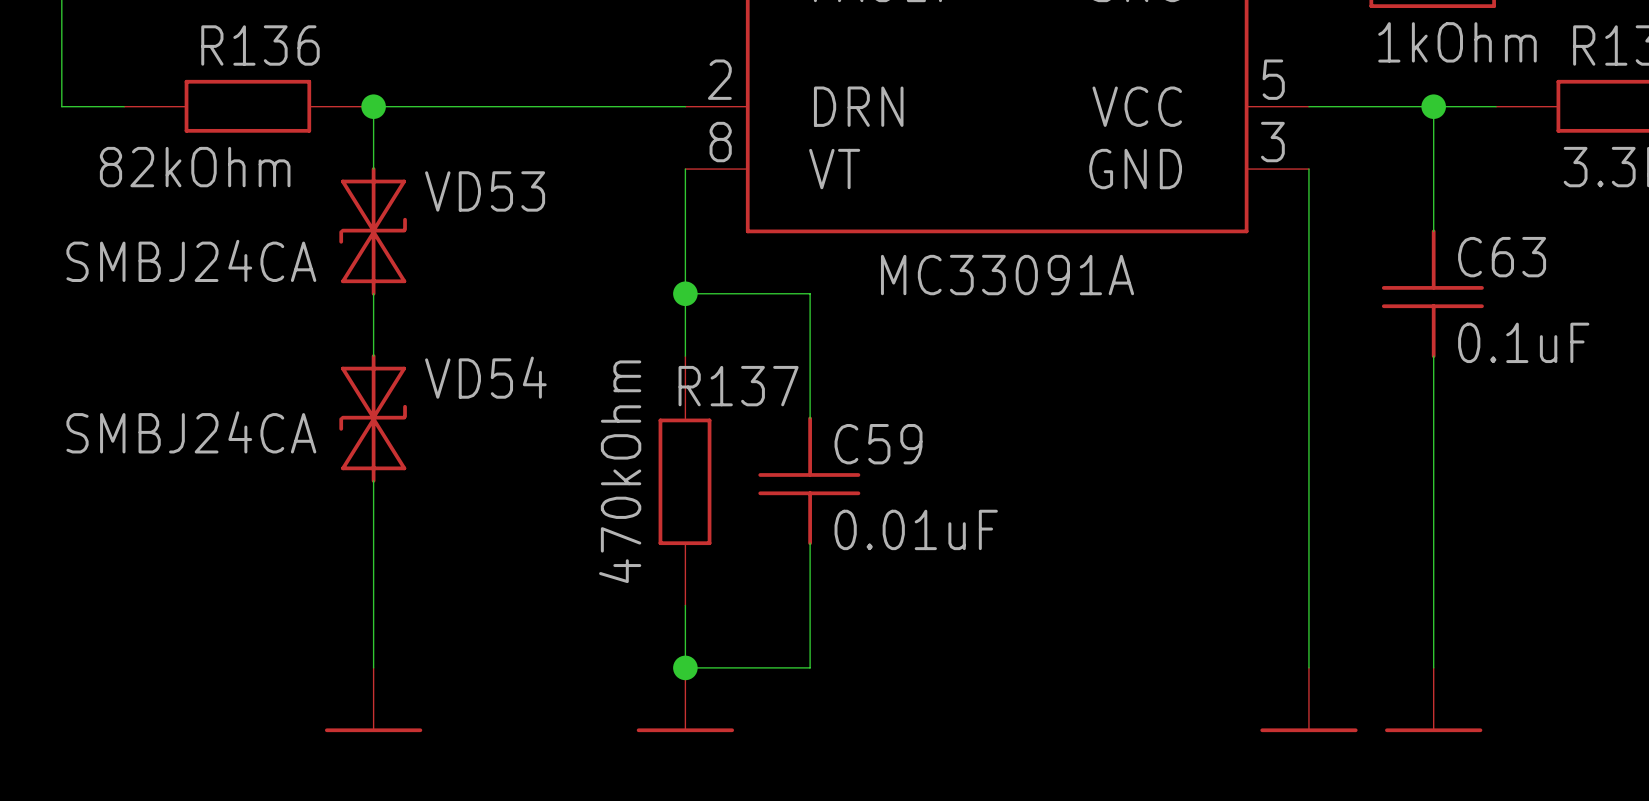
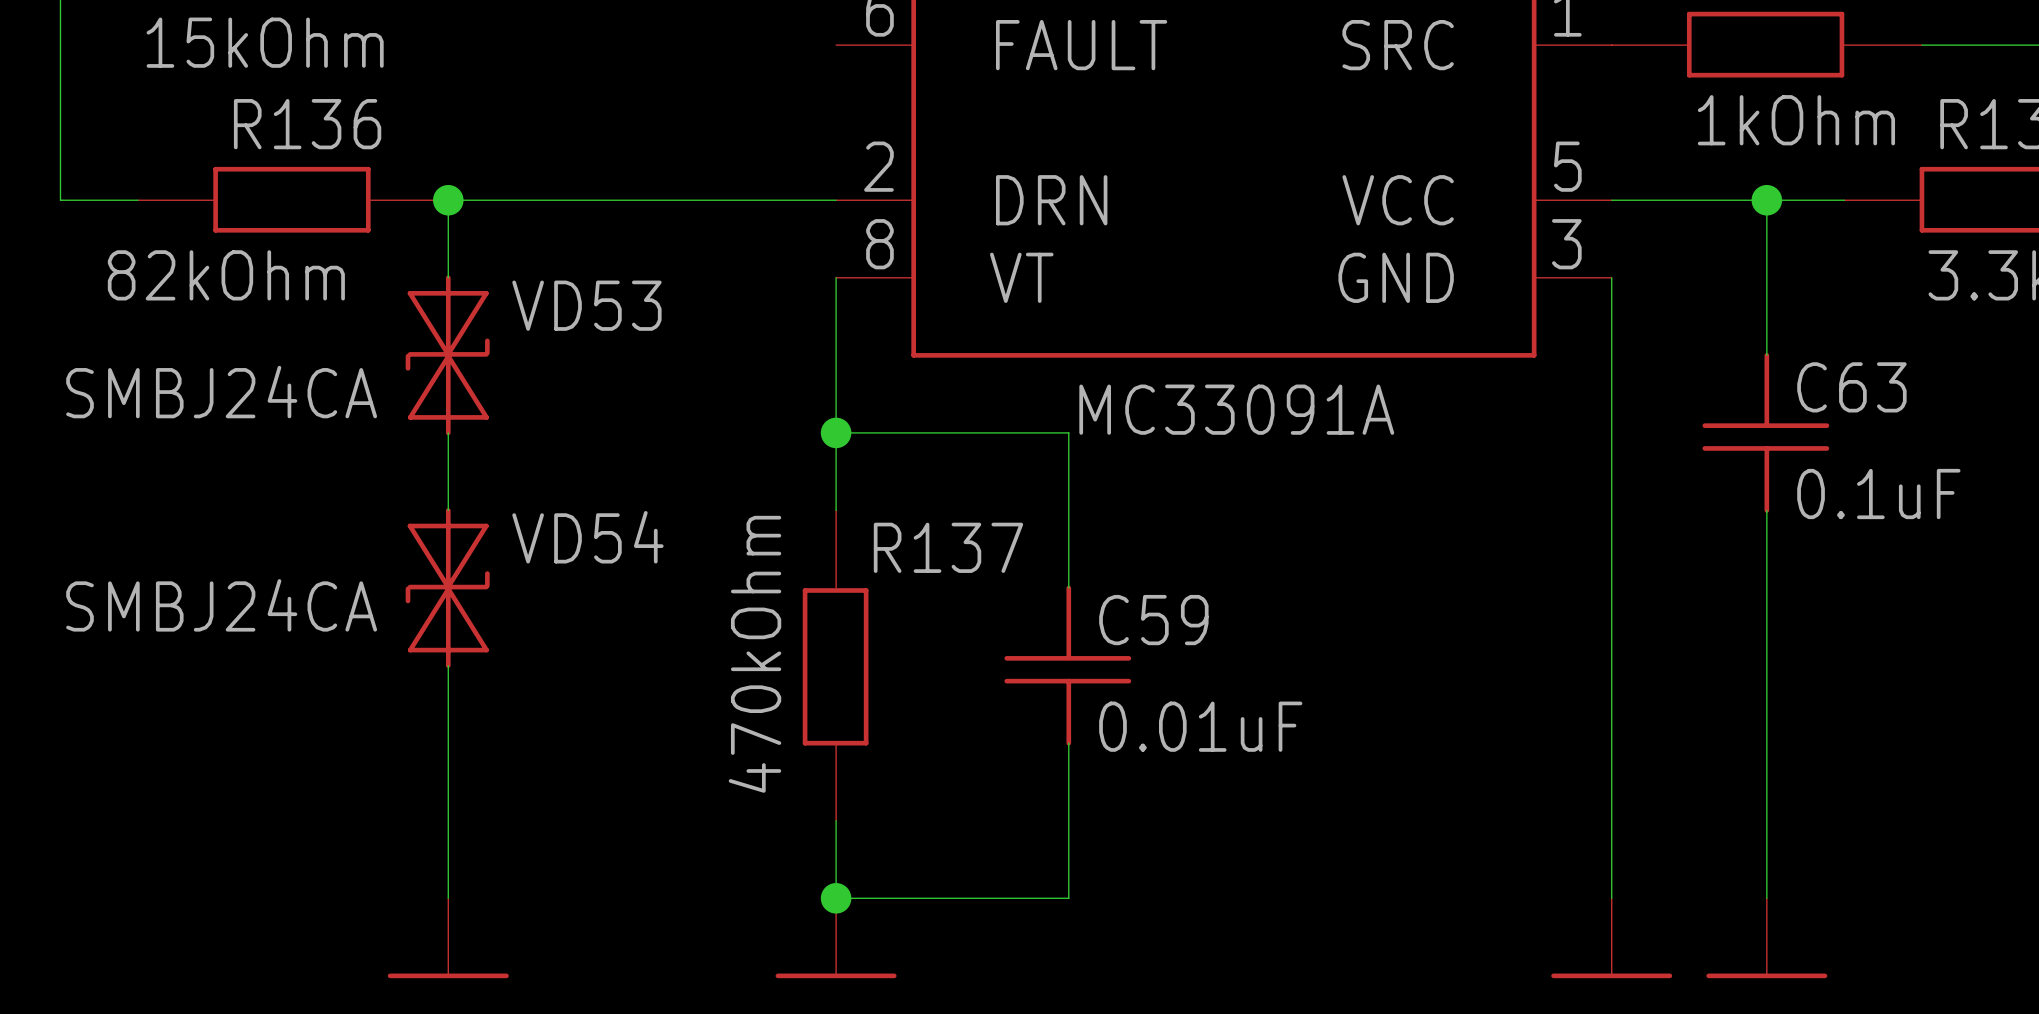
wire: (810, 293) (810, 418) -> (991, 432) (1068, 432) (1068, 588)
R137 name position: R137 (738, 386) -> R137 (948, 547)
C59 position: (809, 480) -> (1067, 665)
wire: (810, 543) (810, 667) -> (1068, 743) (1068, 898) (991, 898)

